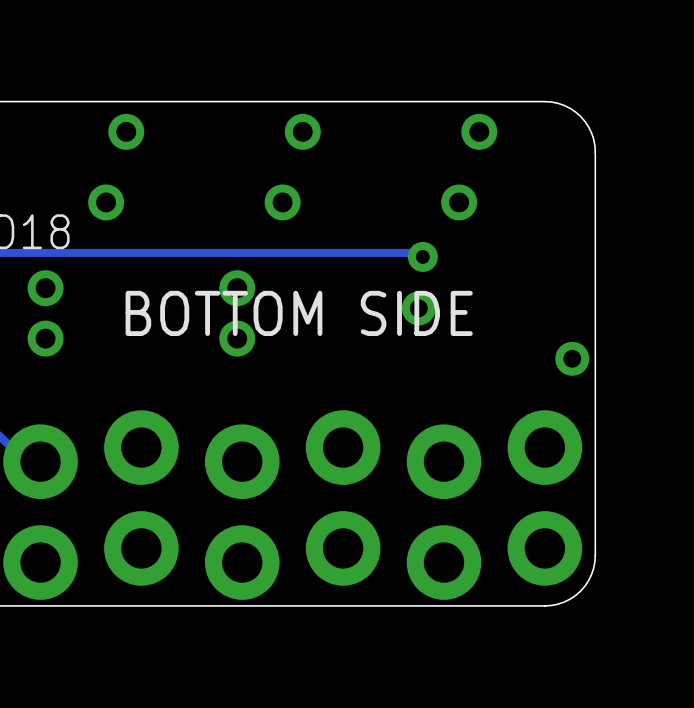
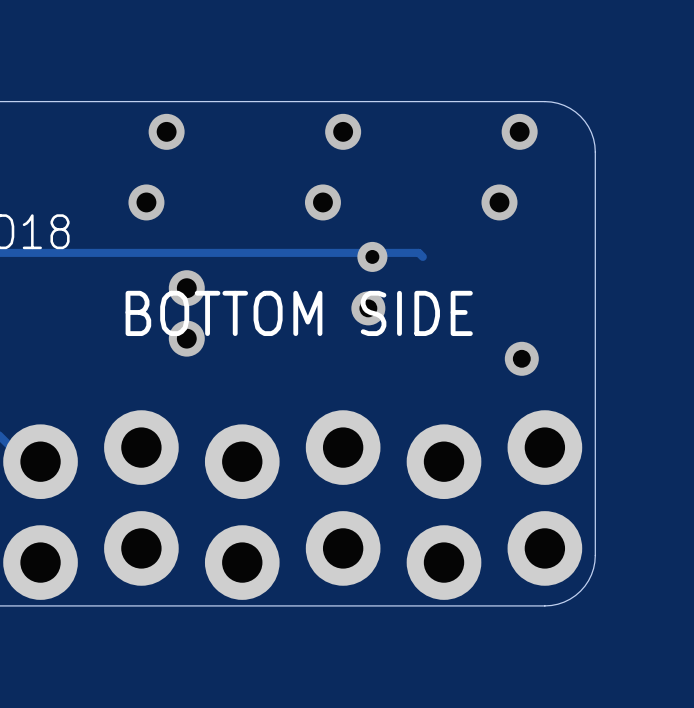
via: (126, 131) -> none
via: none -> (166, 131)
via: (302, 131) -> none
via: none -> (343, 131)
via: (479, 131) -> none
via: none -> (519, 131)
via: (106, 202) -> none
via: none -> (146, 202)
via: (282, 202) -> none
via: none -> (322, 202)
via: (459, 202) -> none
via: none -> (499, 202)
via position: (422, 256) -> (372, 256)
via: (45, 288) -> none
via: none -> (186, 288)
via: (237, 288) -> none
via position: (418, 308) -> (368, 308)
via: (45, 338) -> none
via: none -> (186, 338)
via: (237, 338) -> none
via position: (572, 358) -> (521, 358)

